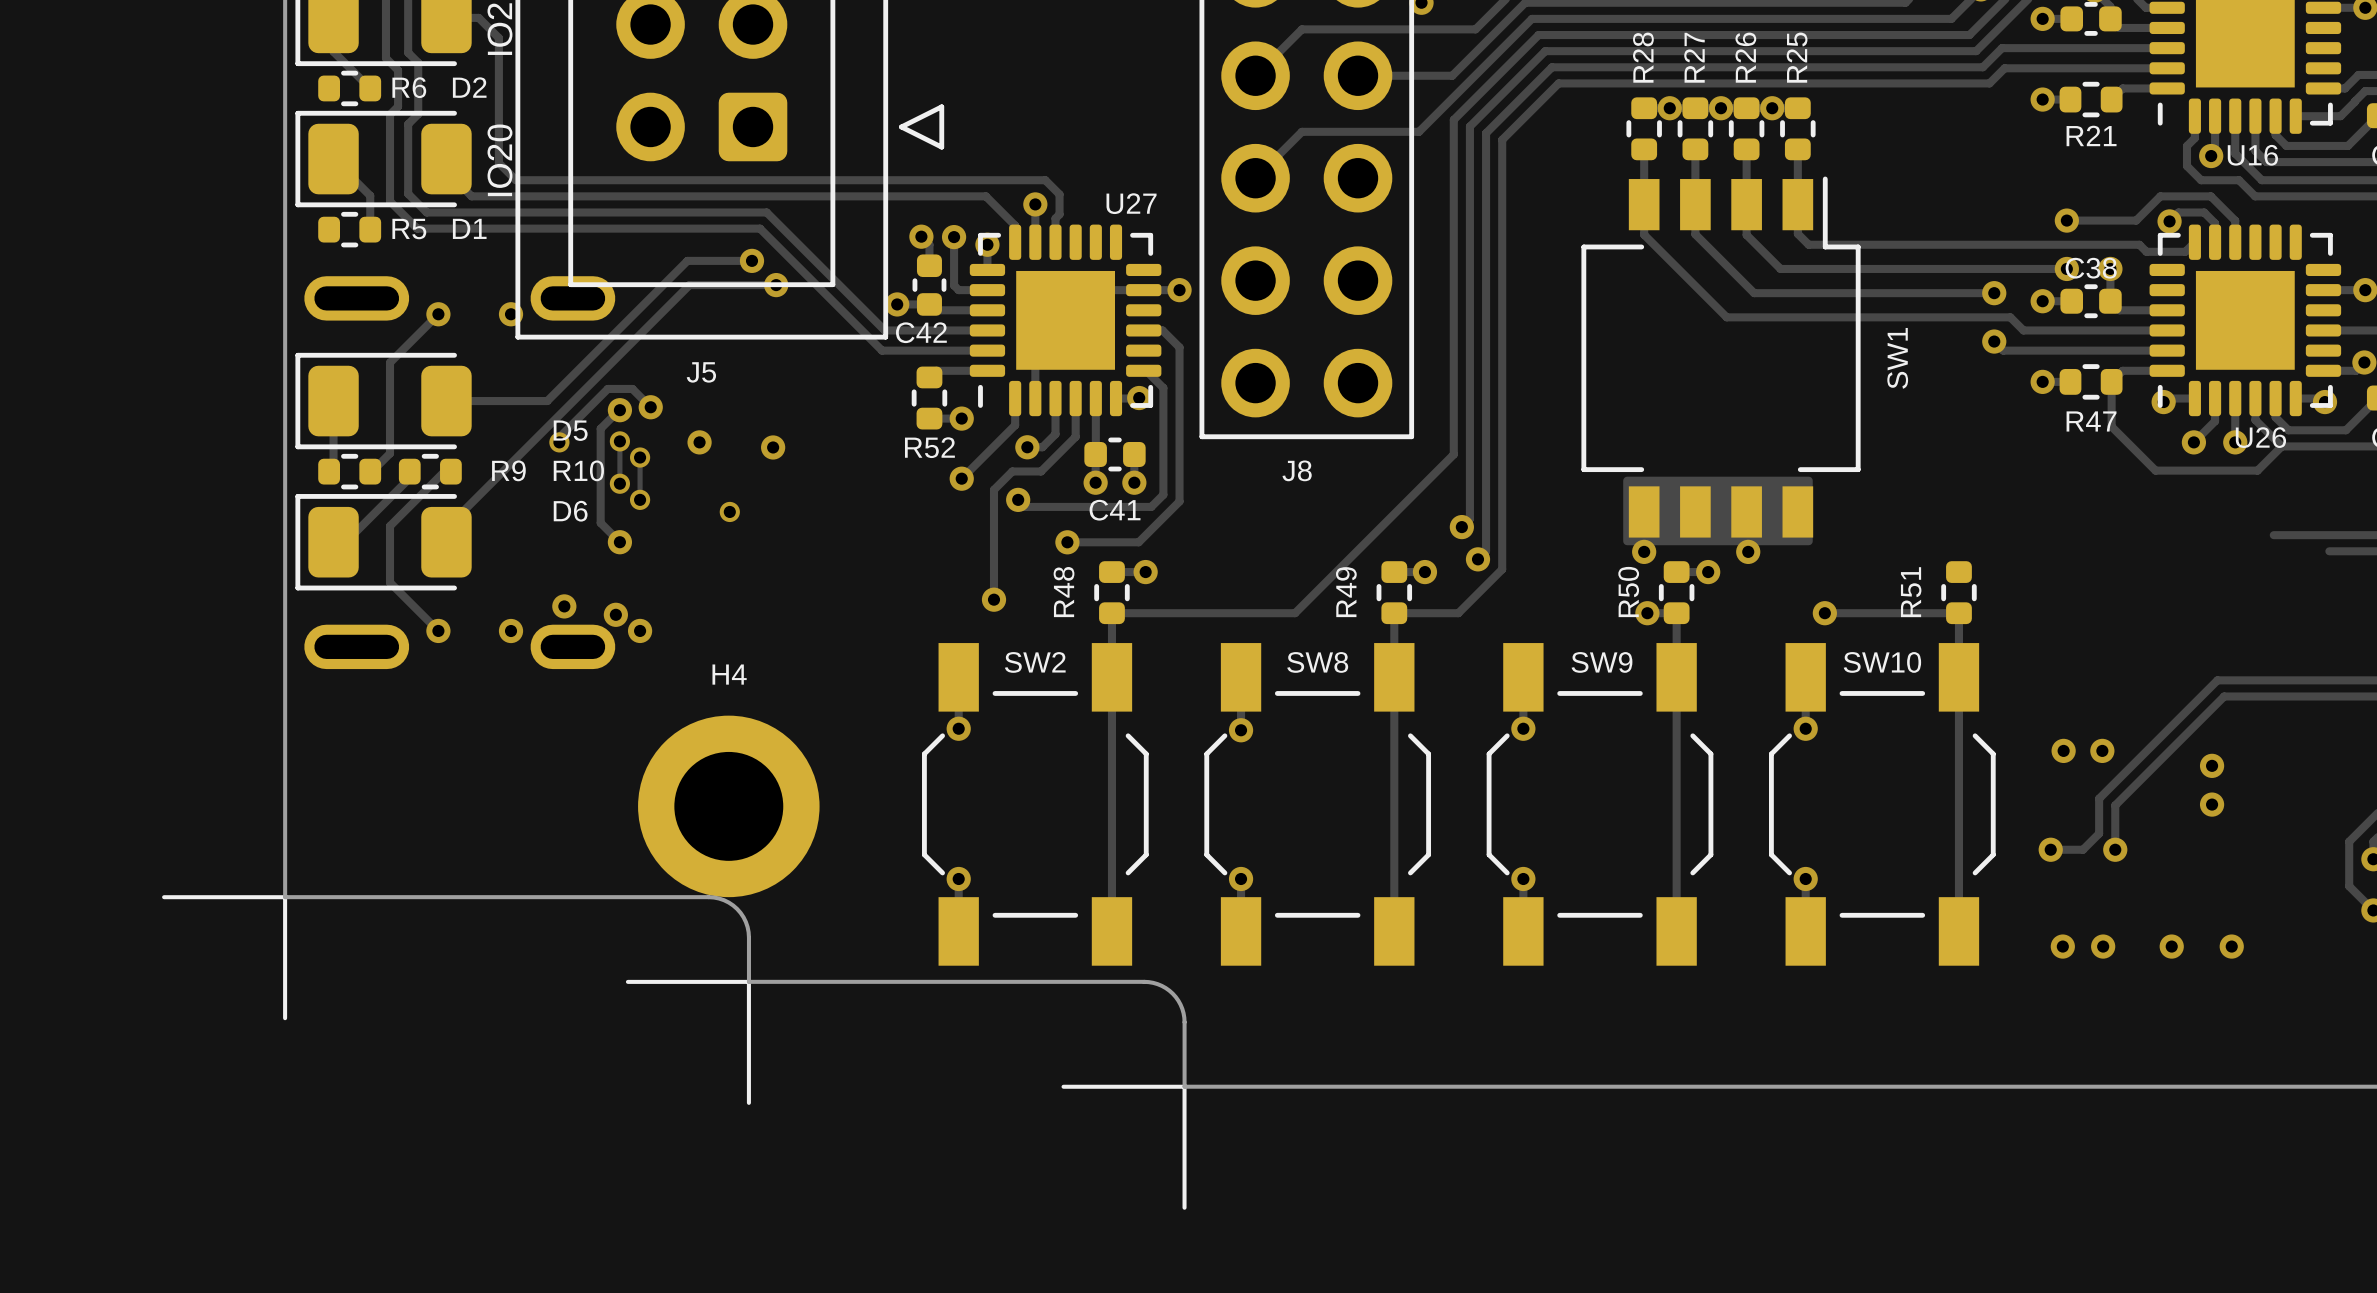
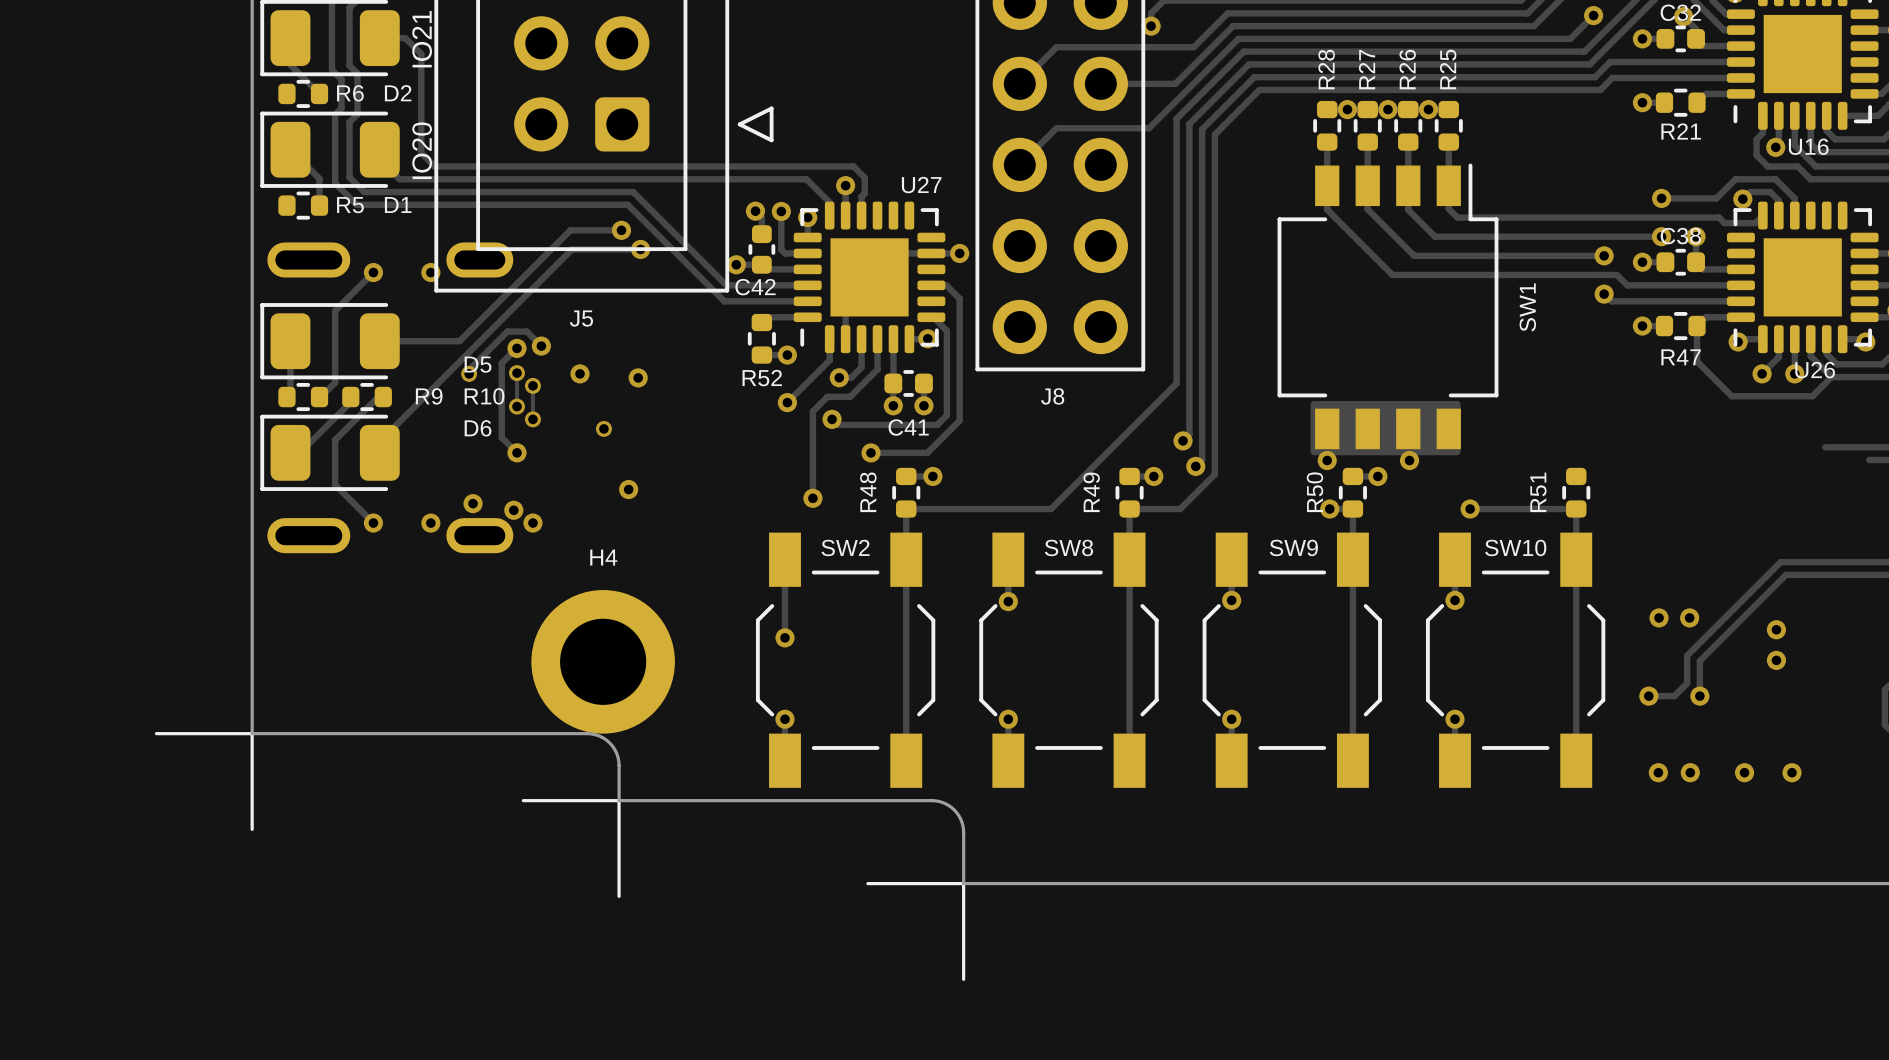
via: none -> (628, 489)
track: none -> (785, 600) (785, 637)
via position: (958, 728) -> (785, 637)

